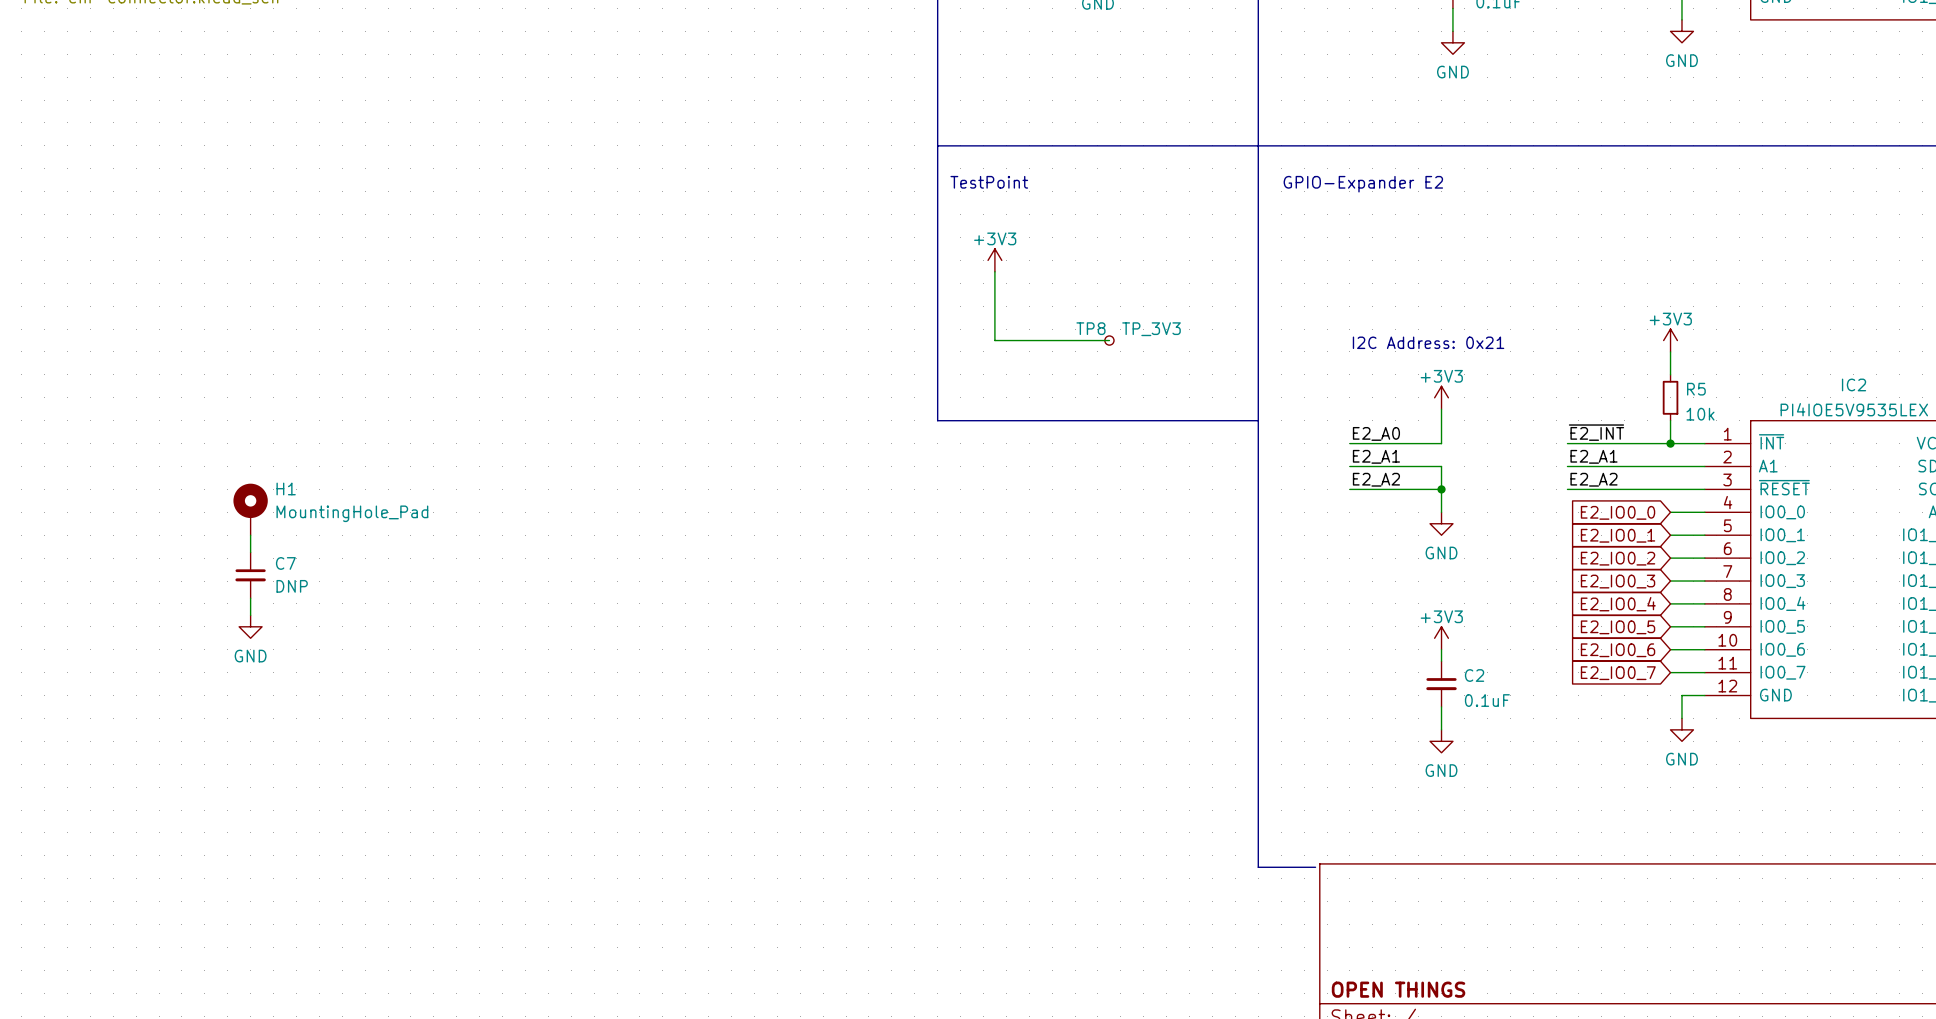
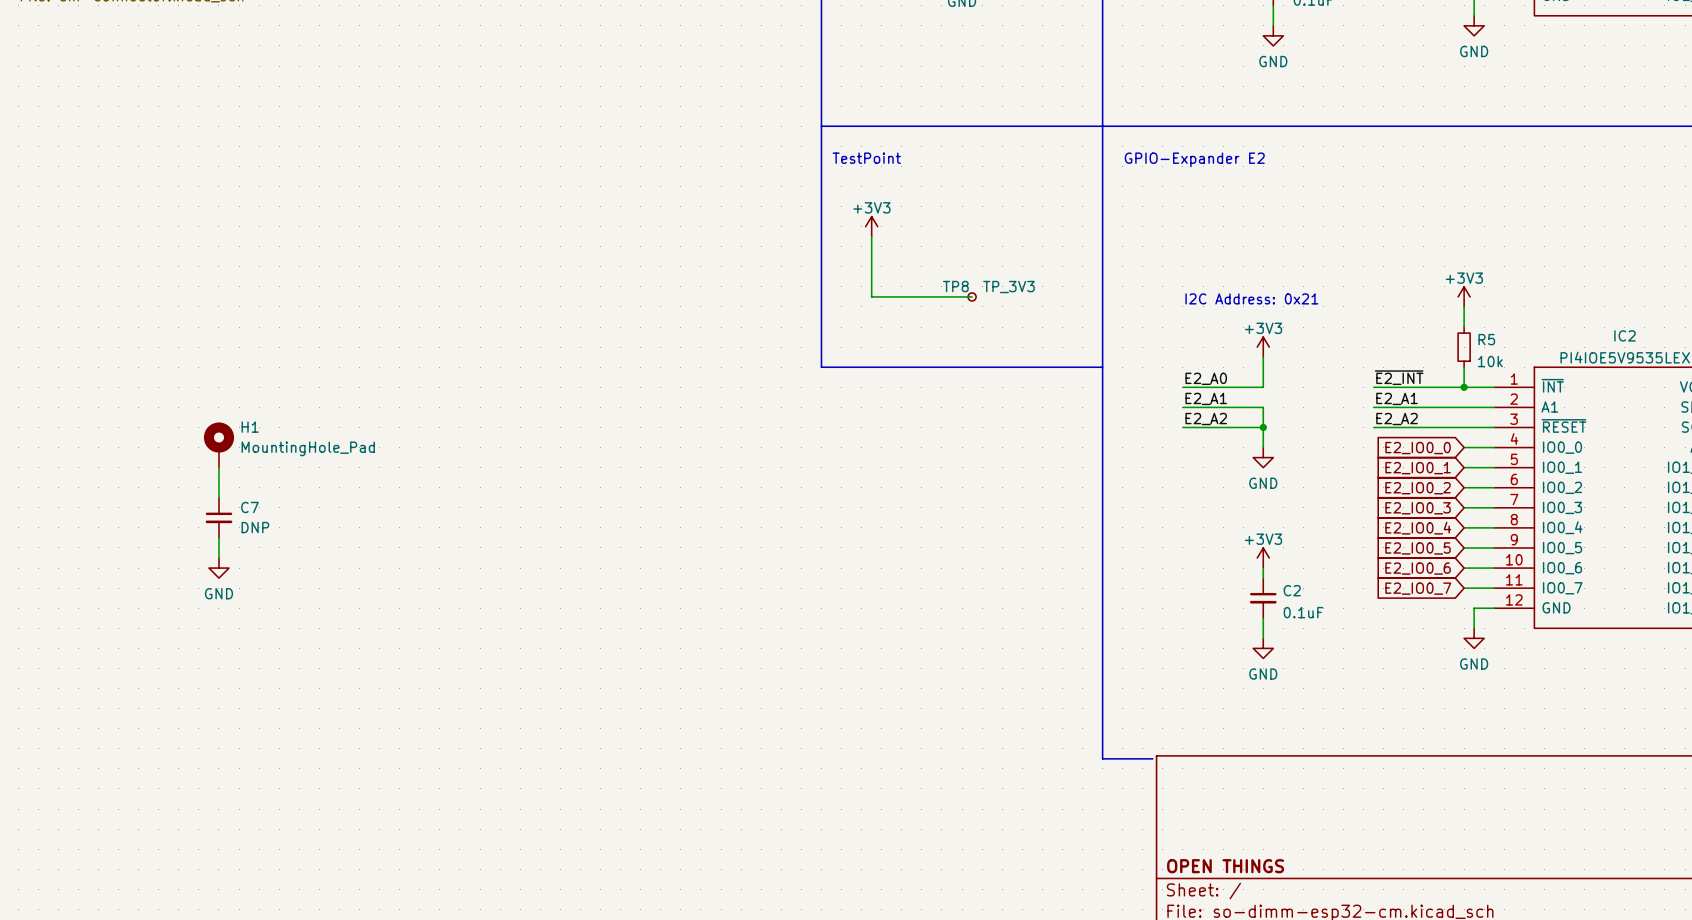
C7 position: (250, 575) -> (218, 517)
power symbol position: GND (250, 626) -> GND (218, 568)

